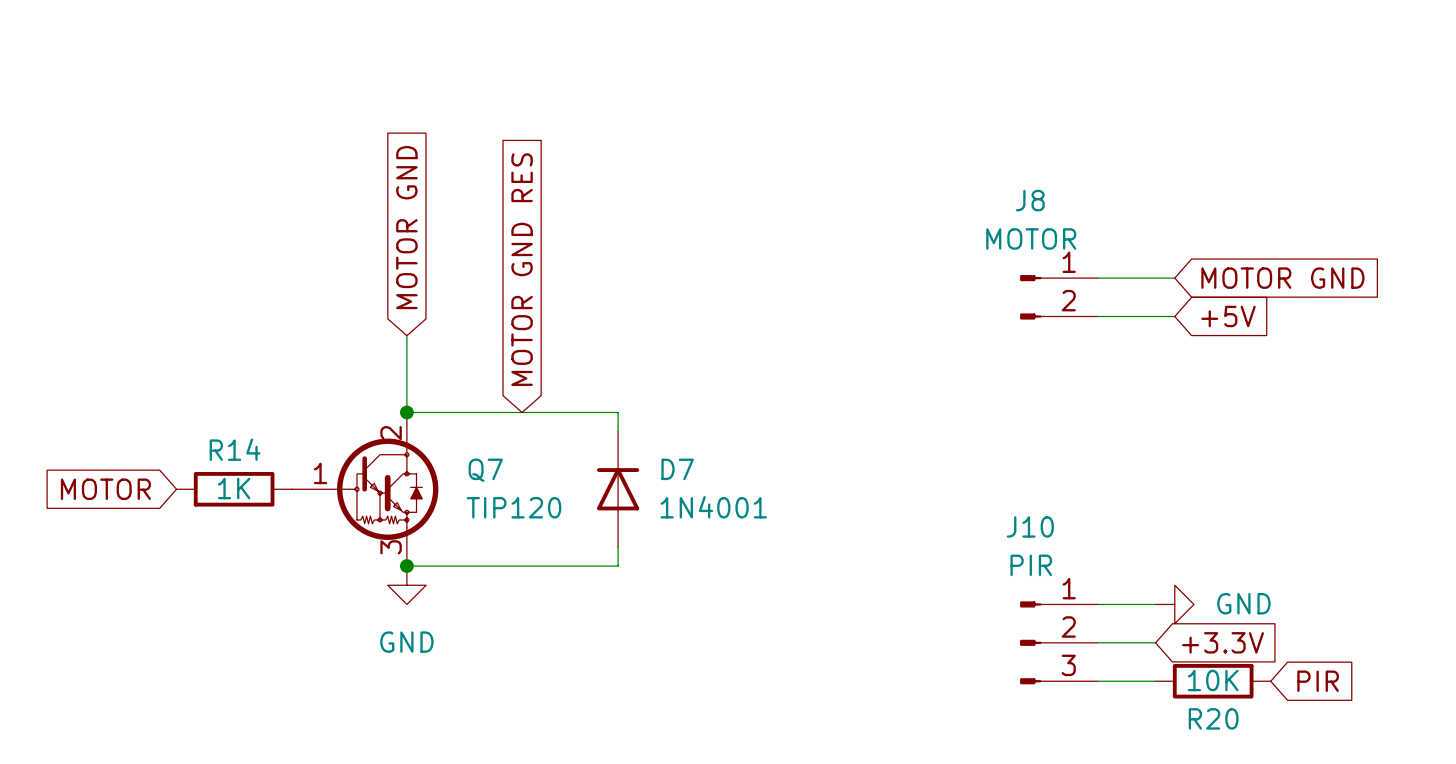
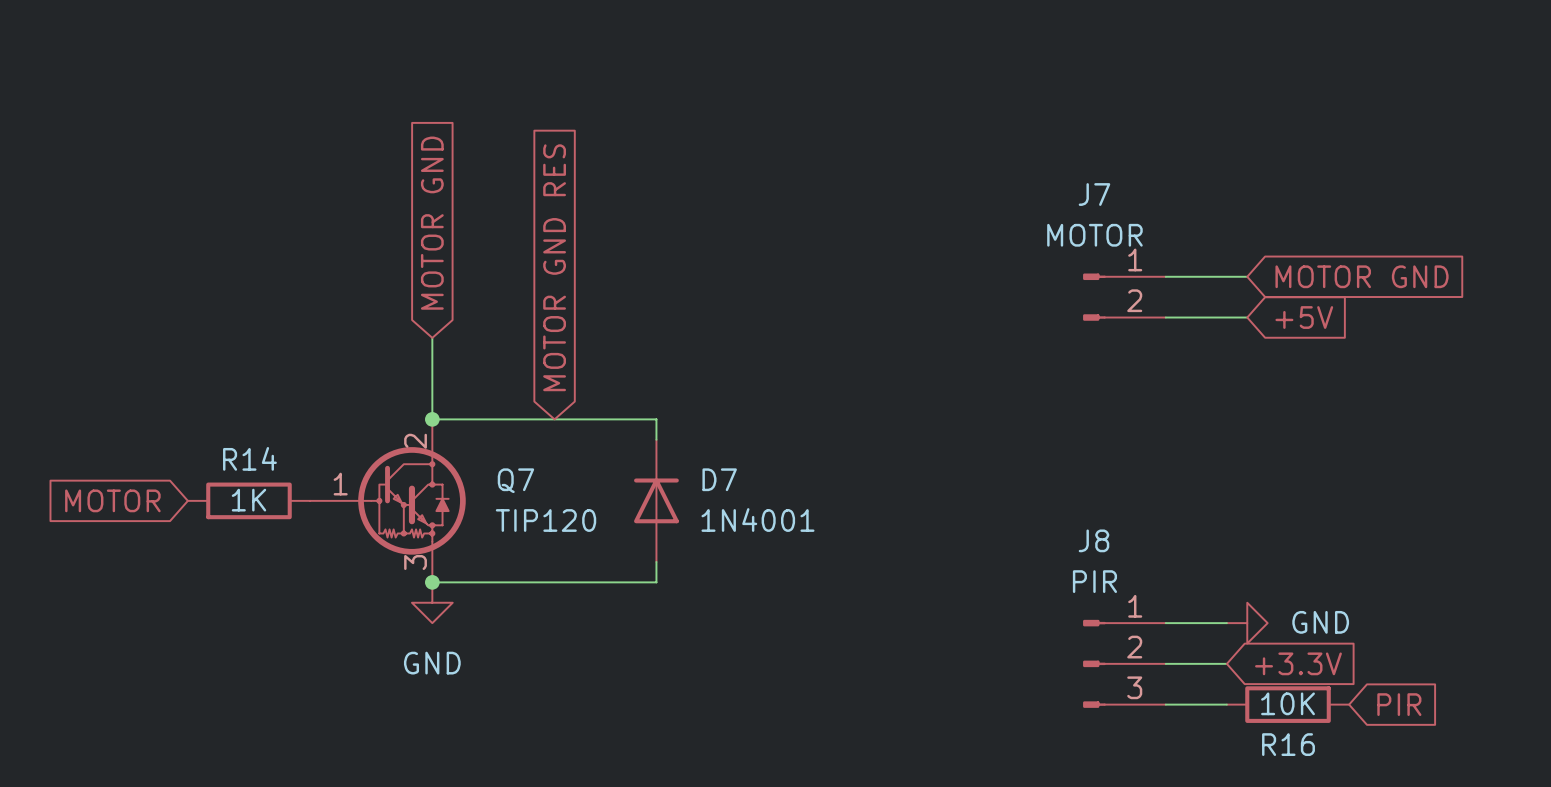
J8 name: J8 (1030, 200) -> J7 (1094, 194)
J10 name: J10 (1030, 526) -> J8 (1093, 540)
R20 name: R20 (1213, 718) -> R16 (1288, 744)

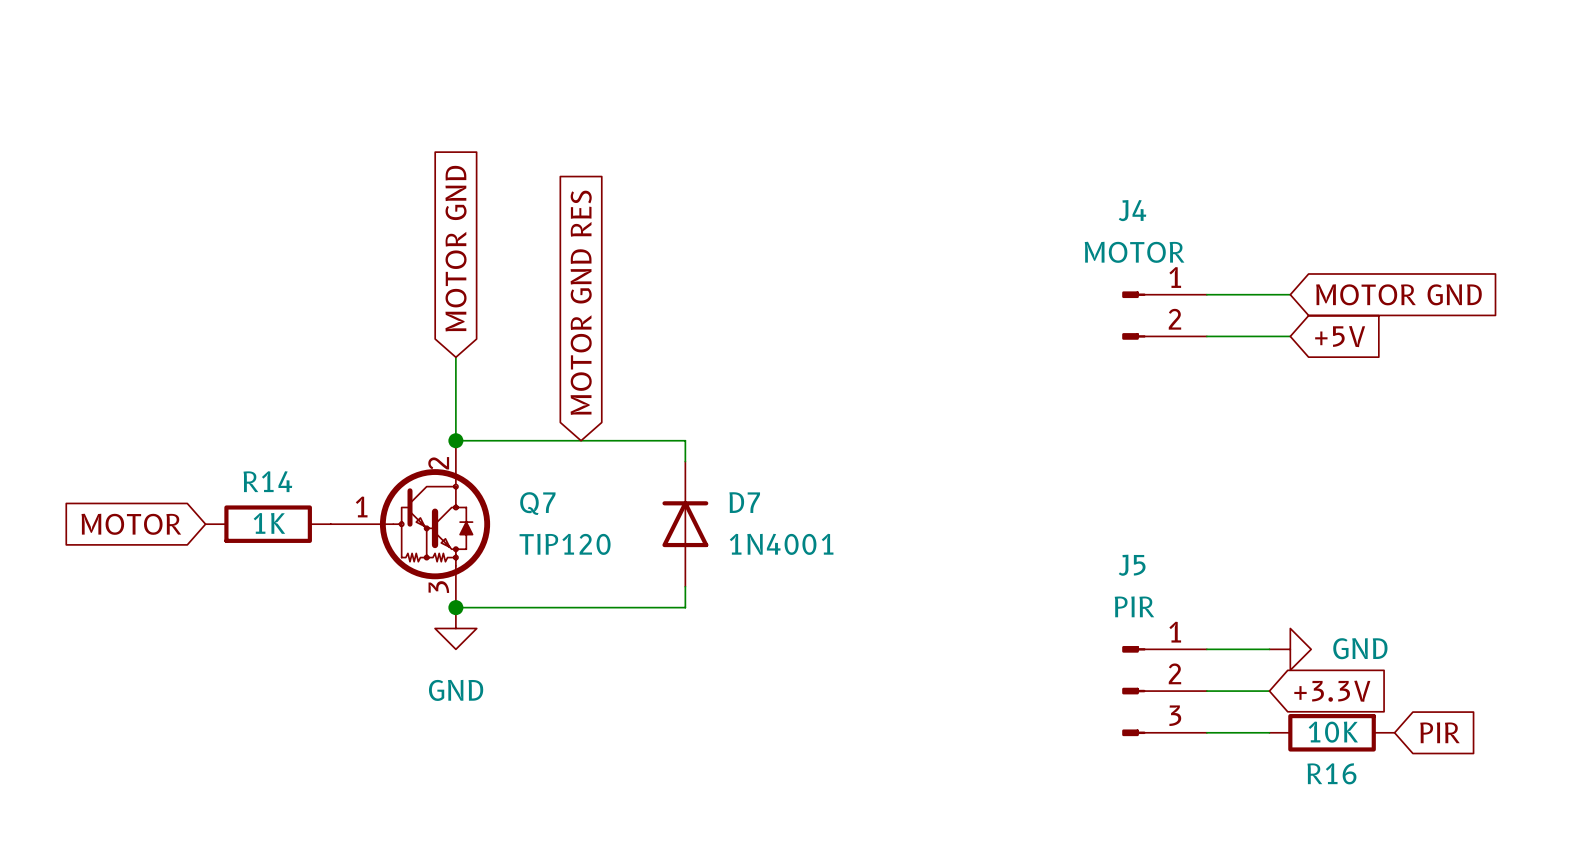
J7 name: J7 (1094, 194) -> J4 (1132, 210)
J8 name: J8 (1093, 540) -> J5 (1132, 565)

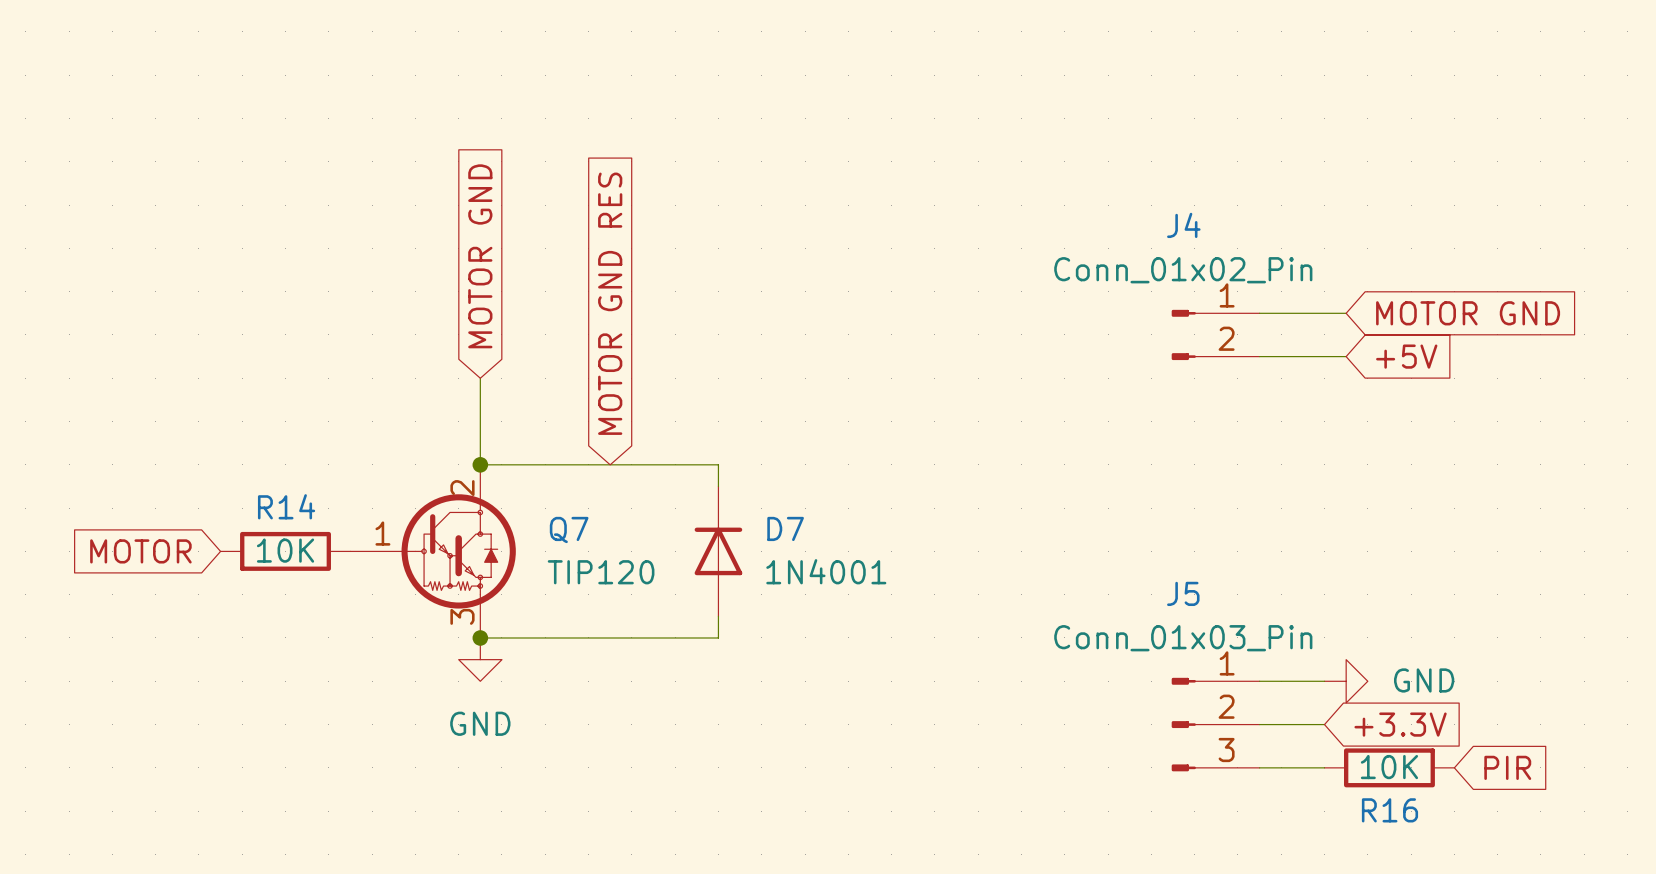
J4 value: MOTOR (1134, 252) -> Conn_01x02_Pin (1183, 270)
R14 value: 1K (269, 523) -> 10K (285, 550)
J5 value: PIR (1134, 606) -> Conn_01x03_Pin (1183, 638)

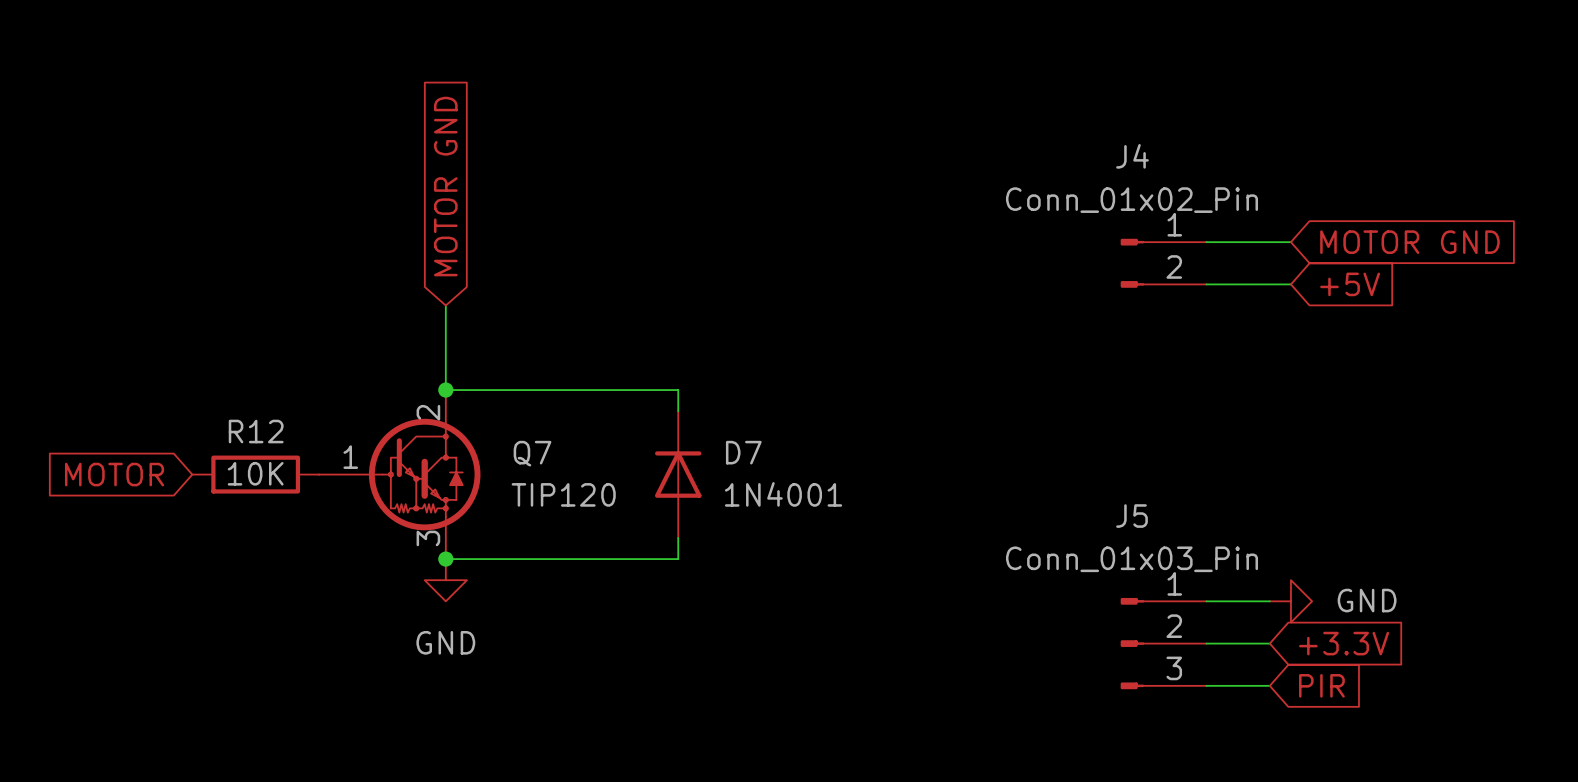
global label: MOTOR GND RES (610, 303) -> none
R14 name: R14 (286, 506) -> R12 (256, 431)
R16: 10K (1389, 767) -> none
global label position: PIR (1507, 767) -> PIR (1321, 685)

